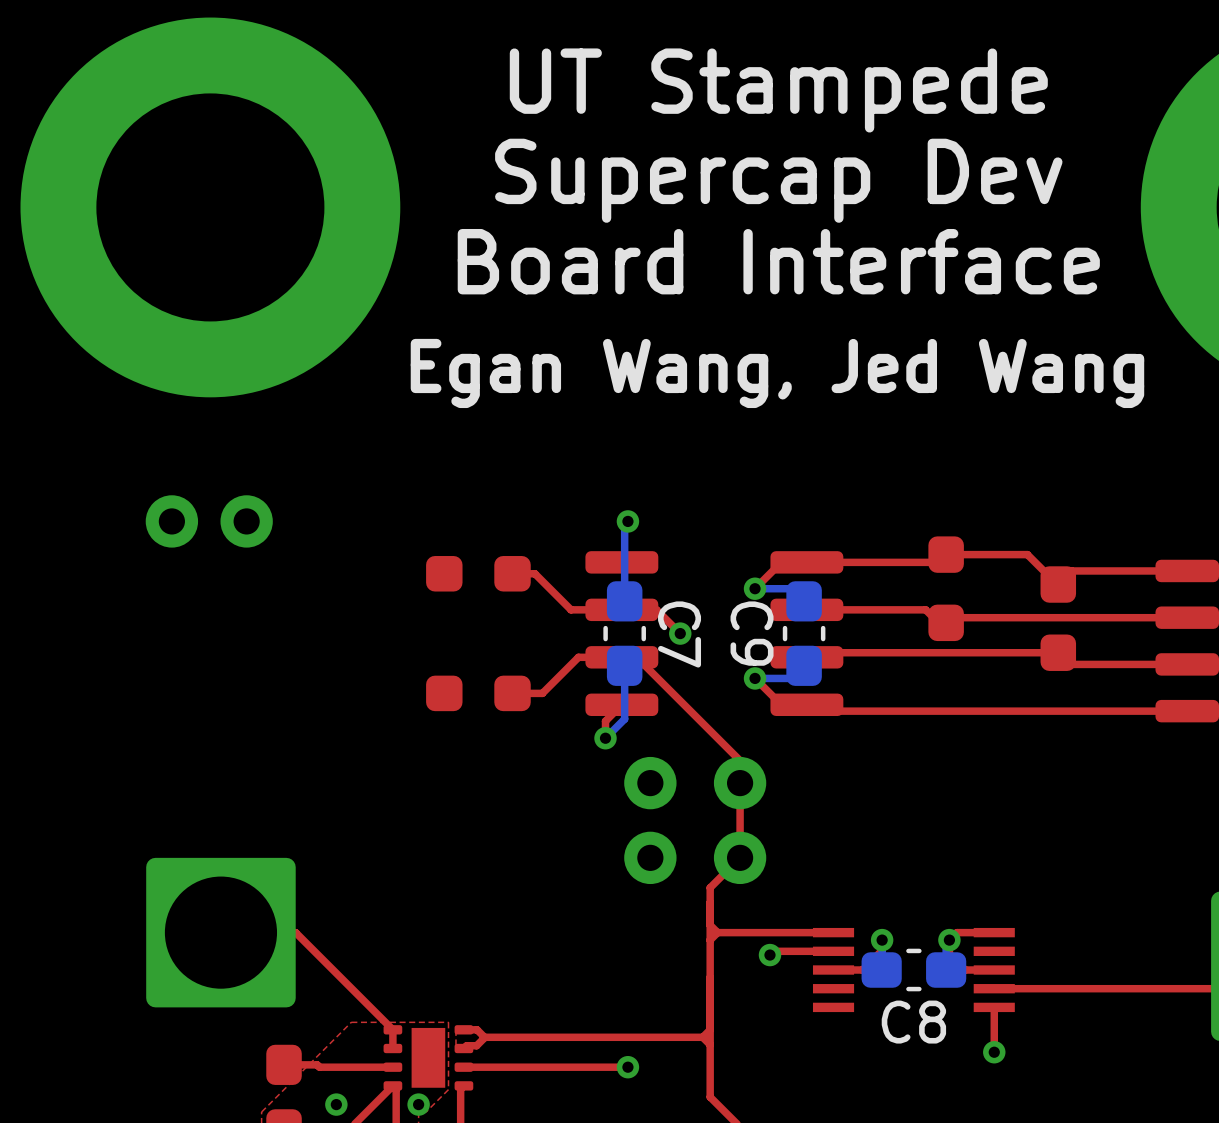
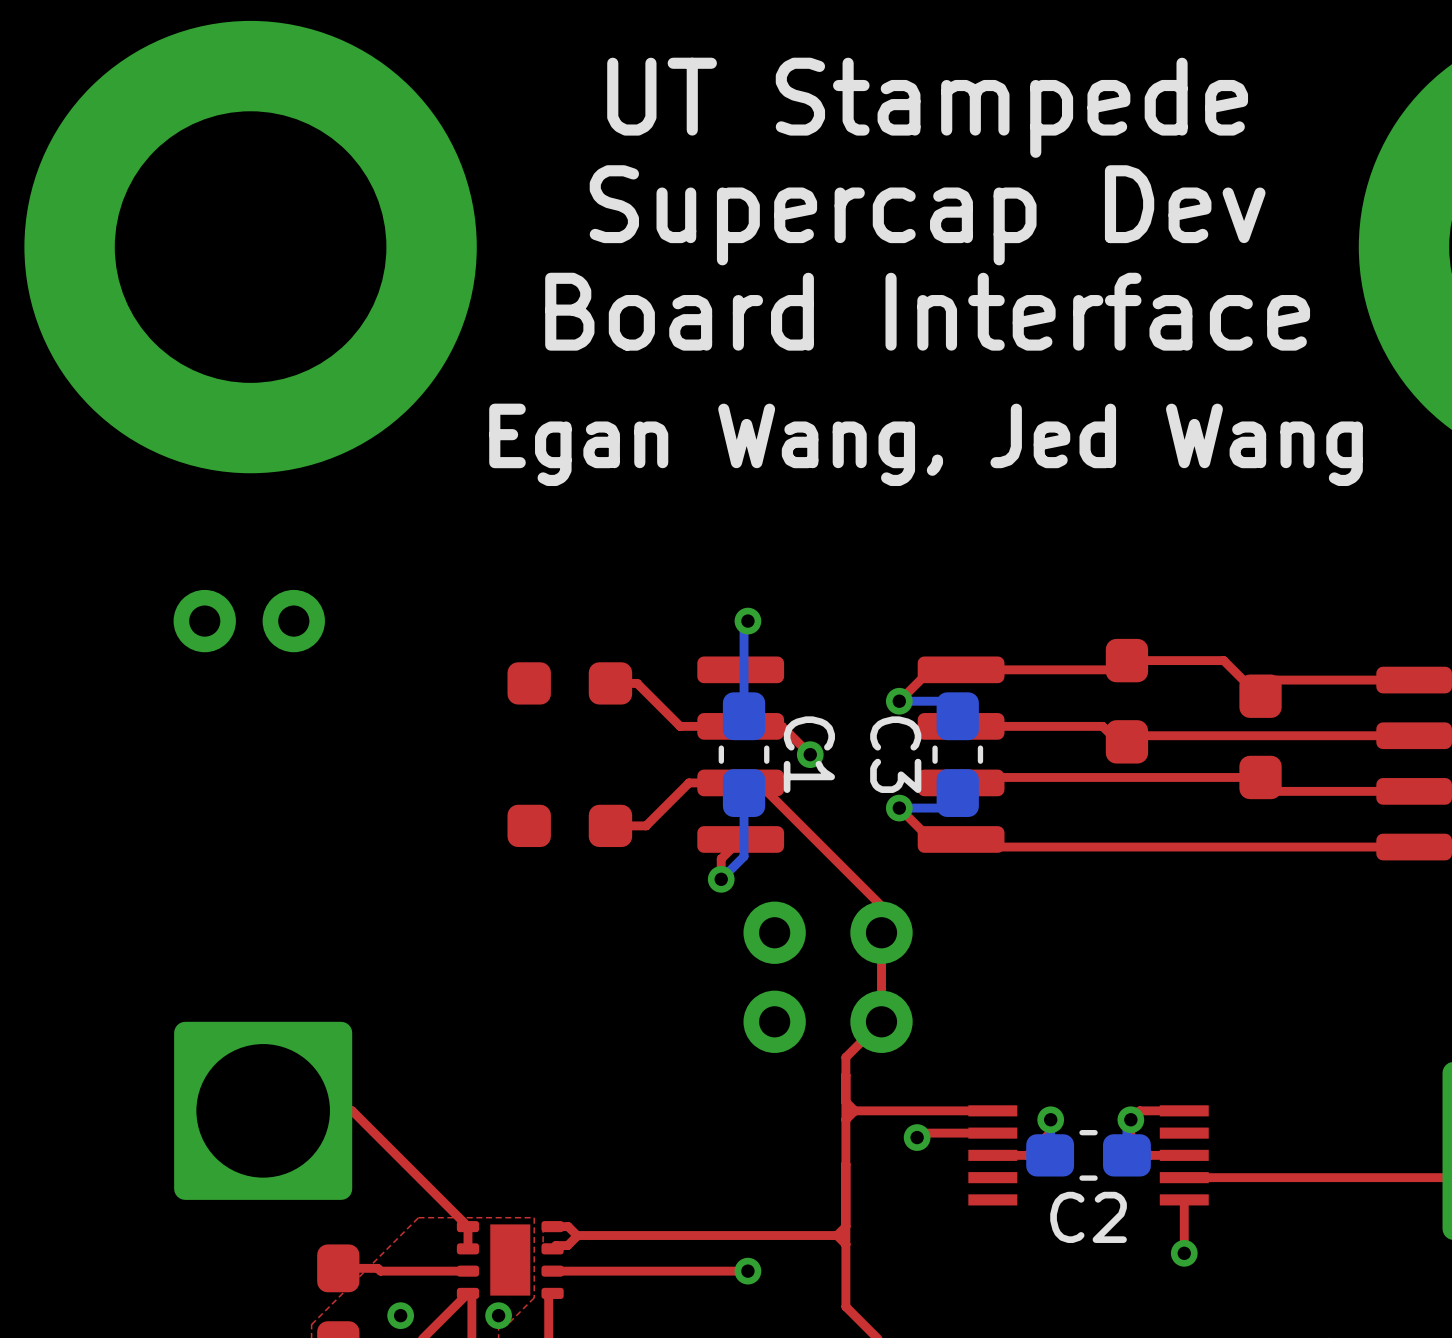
C9 name: C9 (752, 633) -> C3 (895, 754)
C7 name: C7 (679, 634) -> C1 (809, 754)
C8 name: C8 (913, 1022) -> C2 (1088, 1217)

